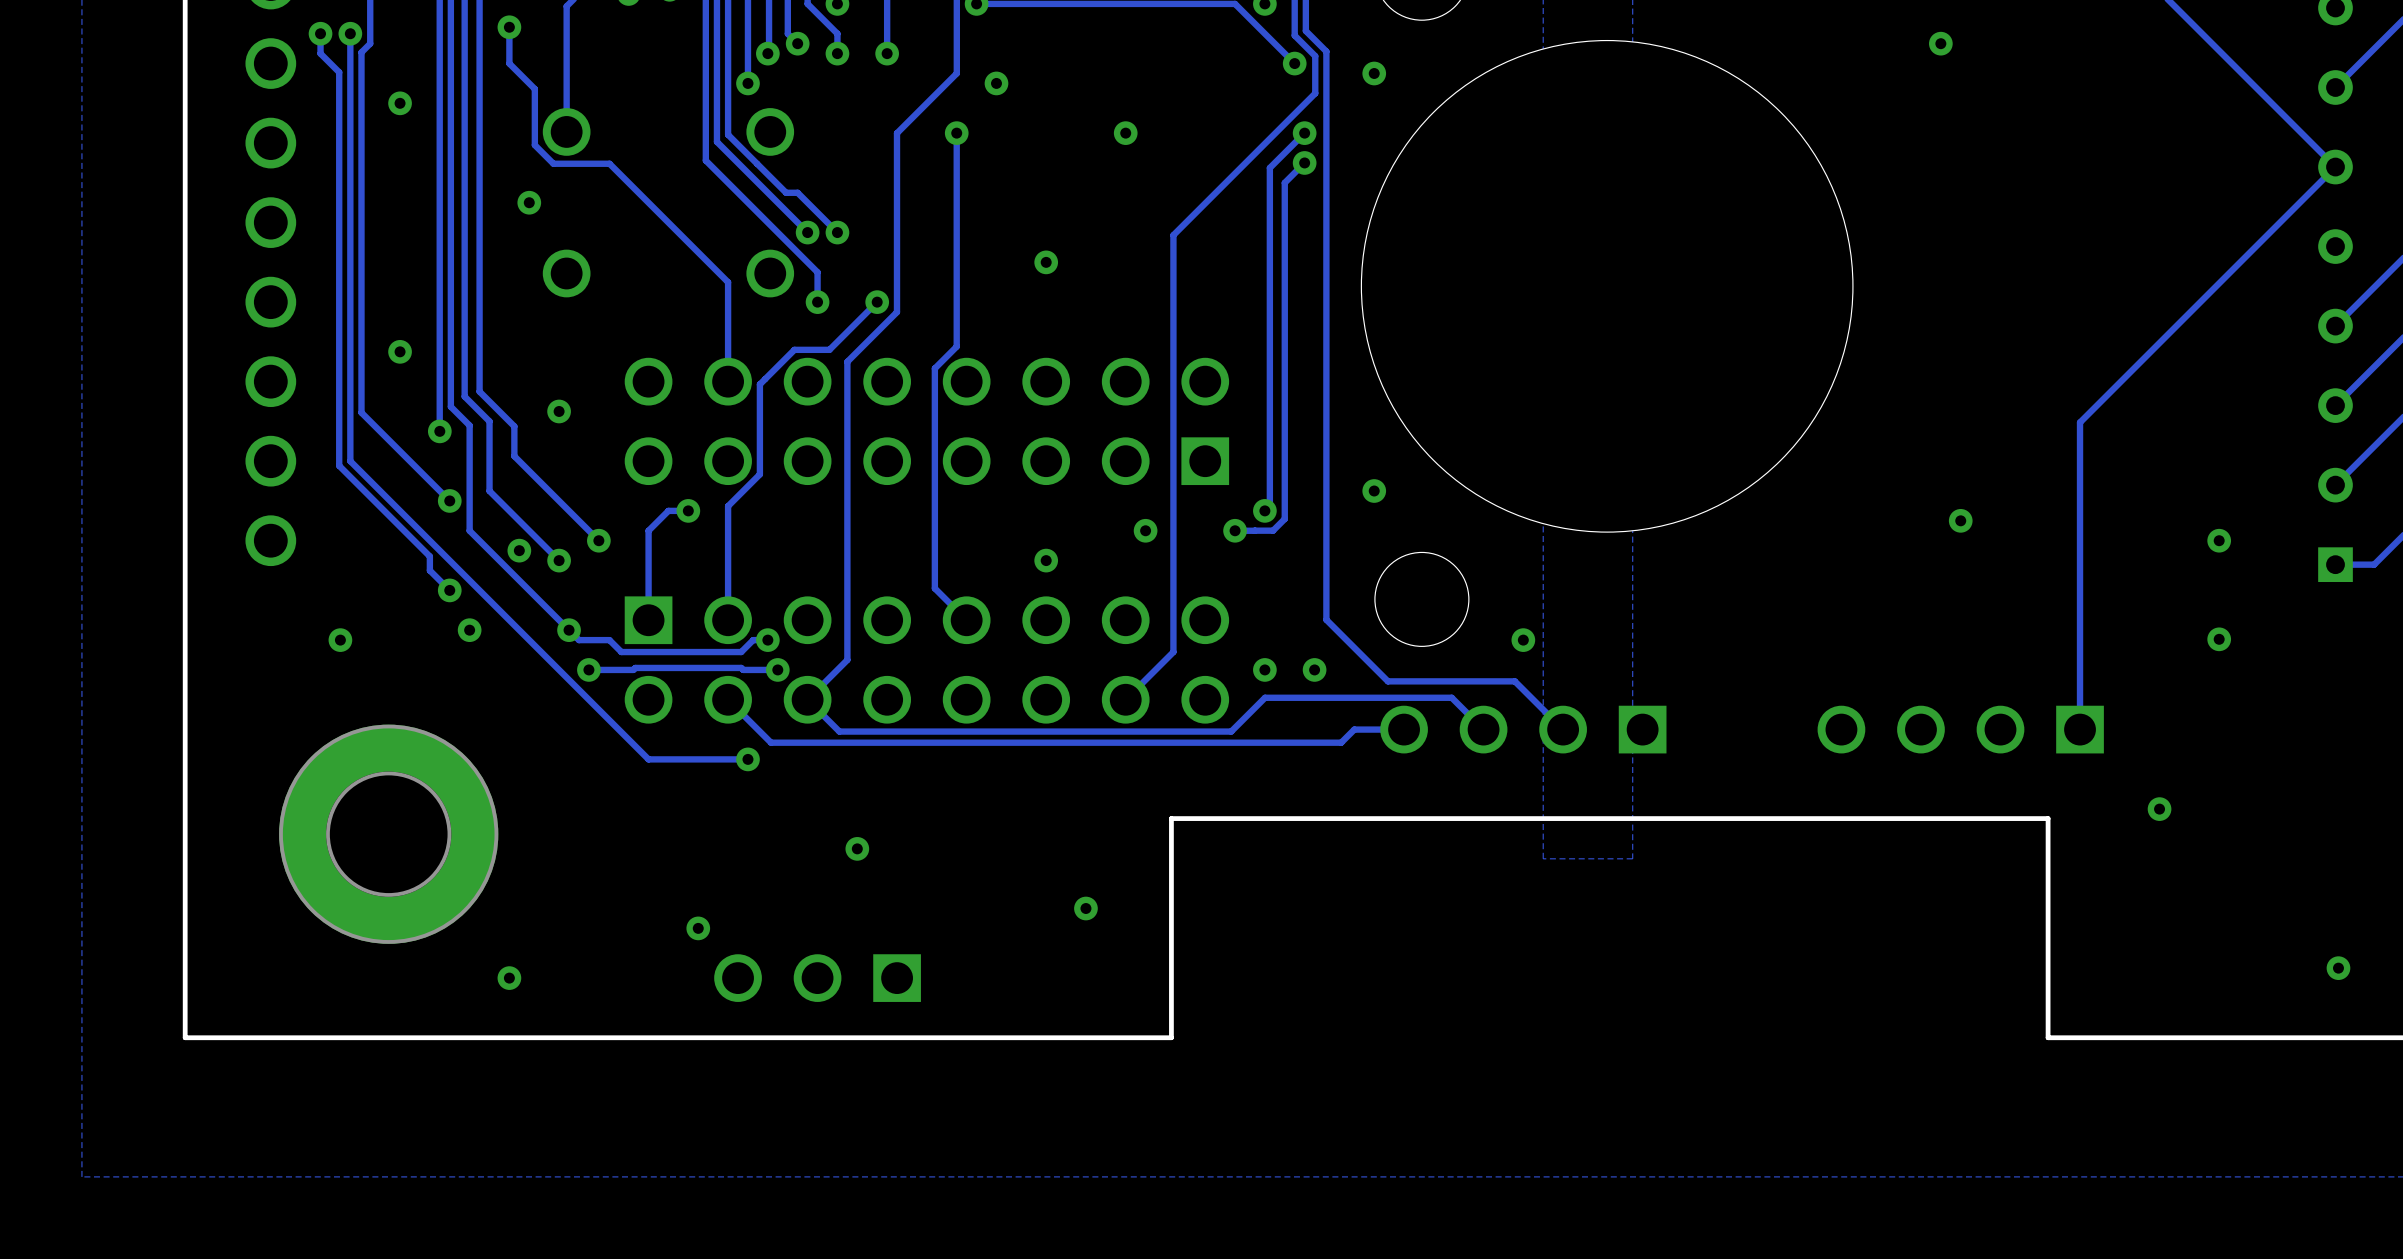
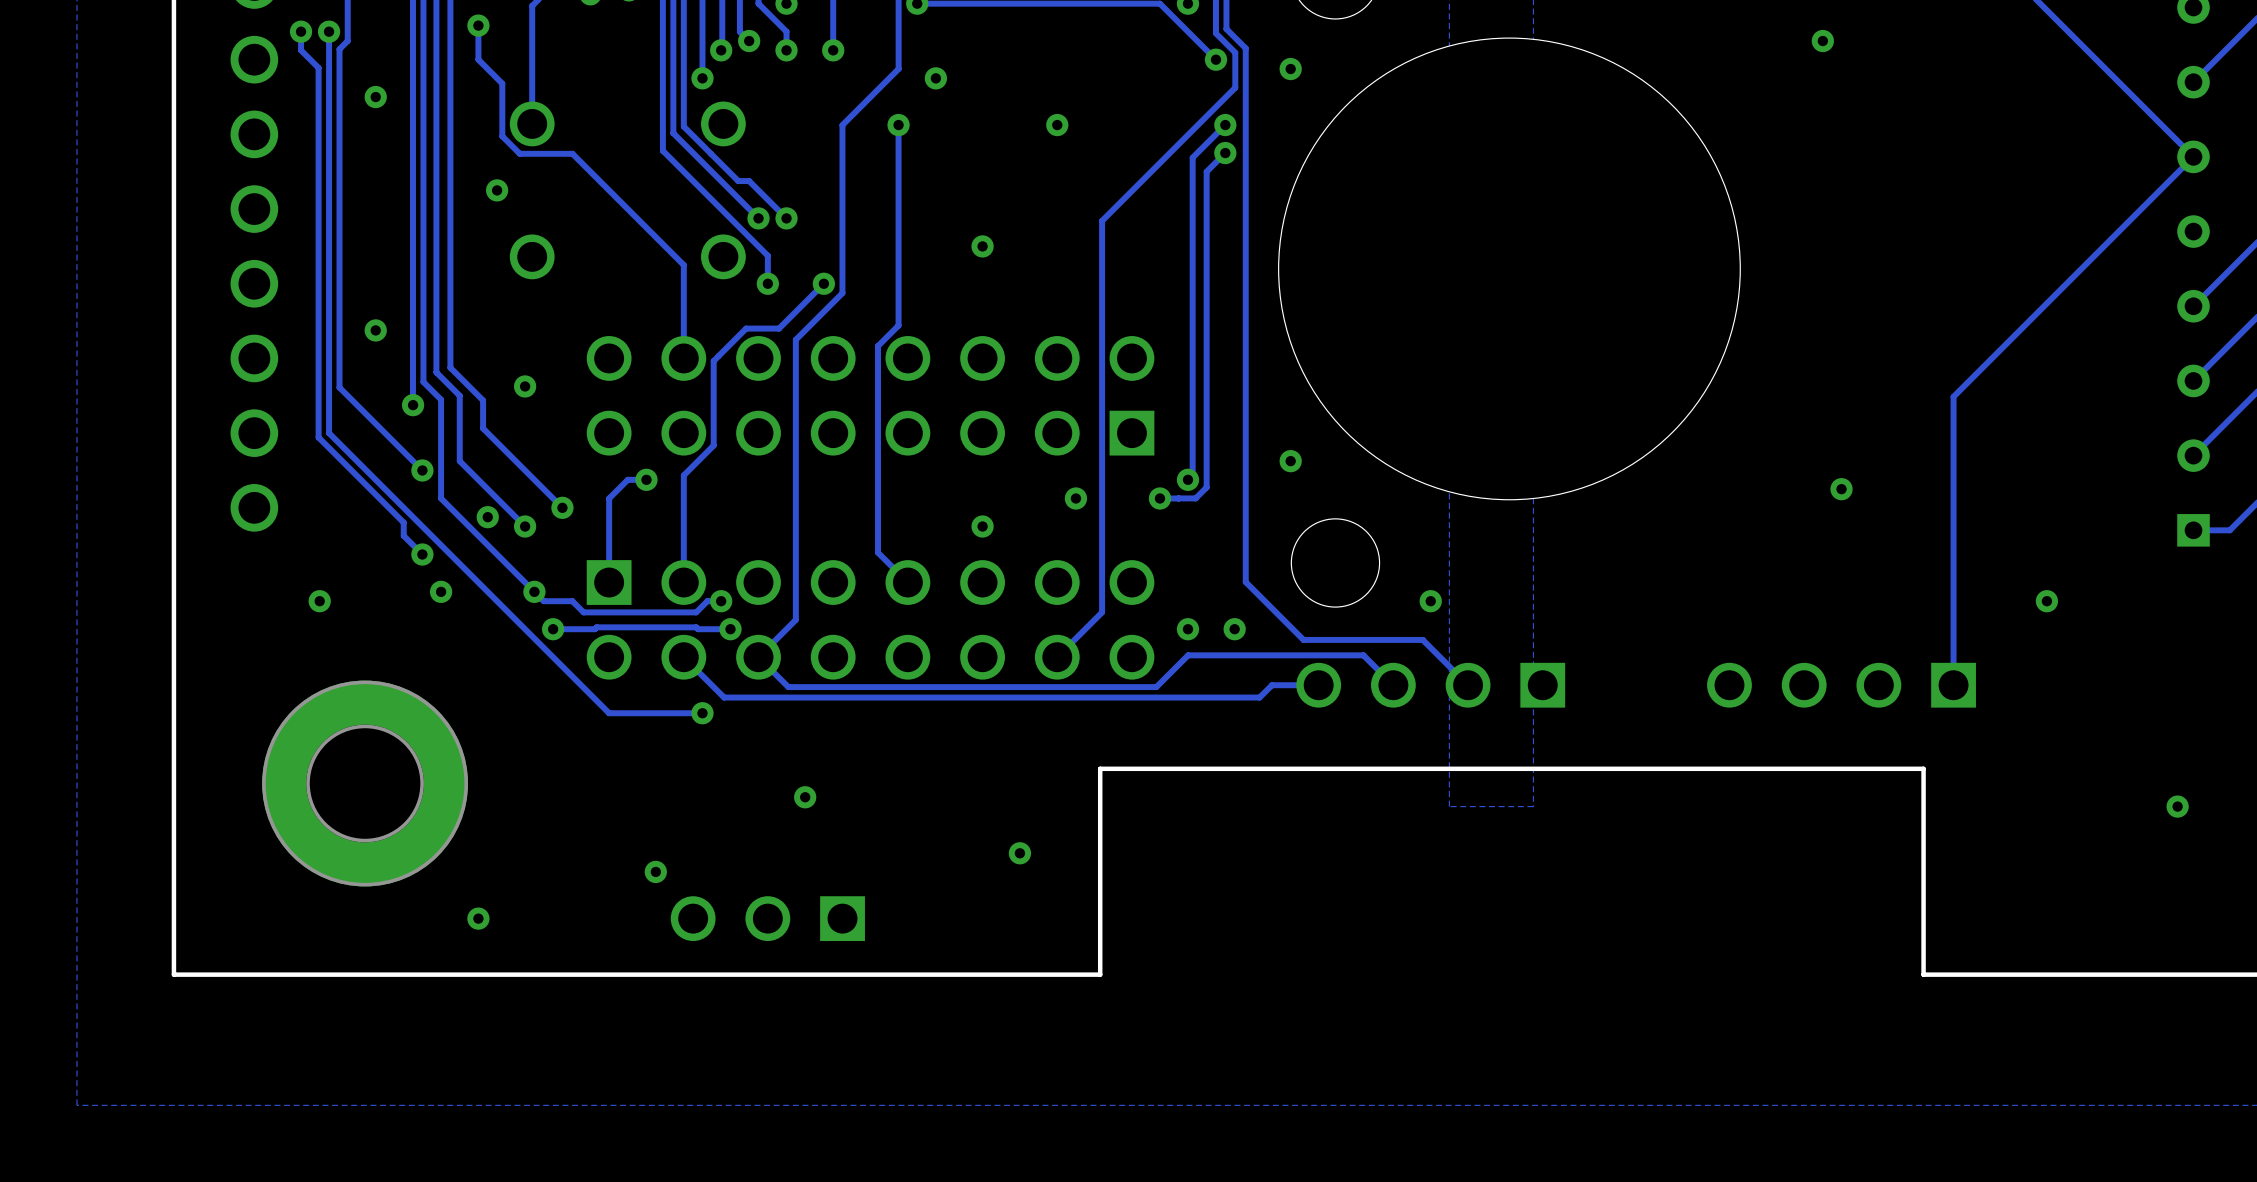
via: (2219, 540) -> none
via position: (2219, 639) -> (2046, 601)
via: (2159, 809) -> none
via: none -> (2177, 806)
via: (2338, 968) -> none

